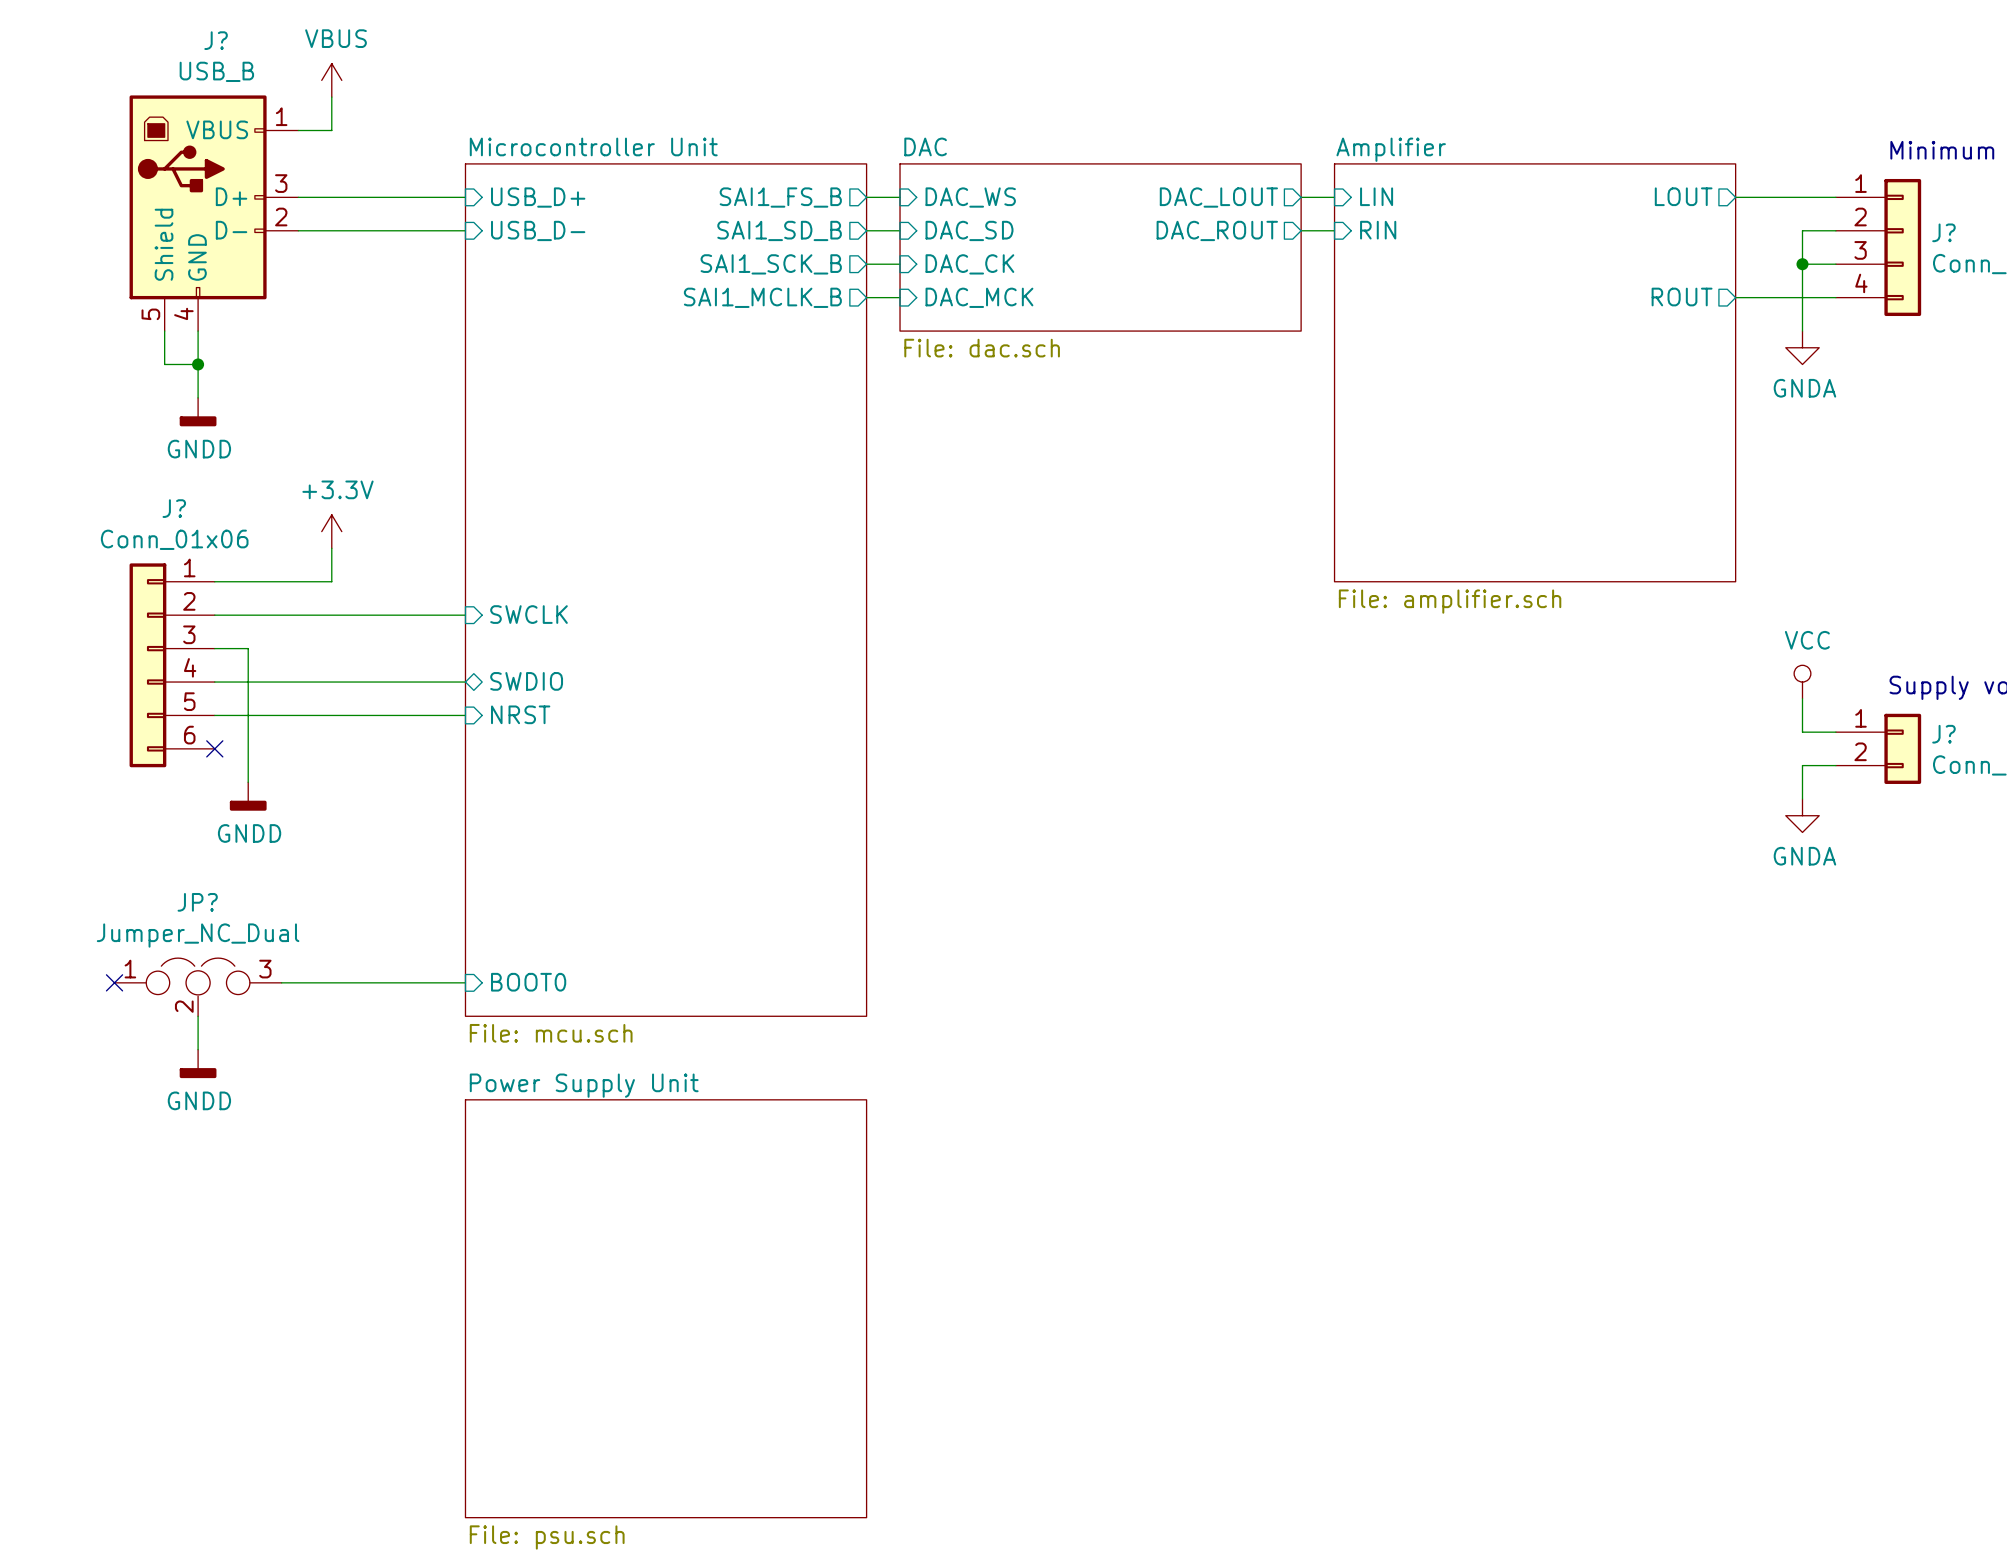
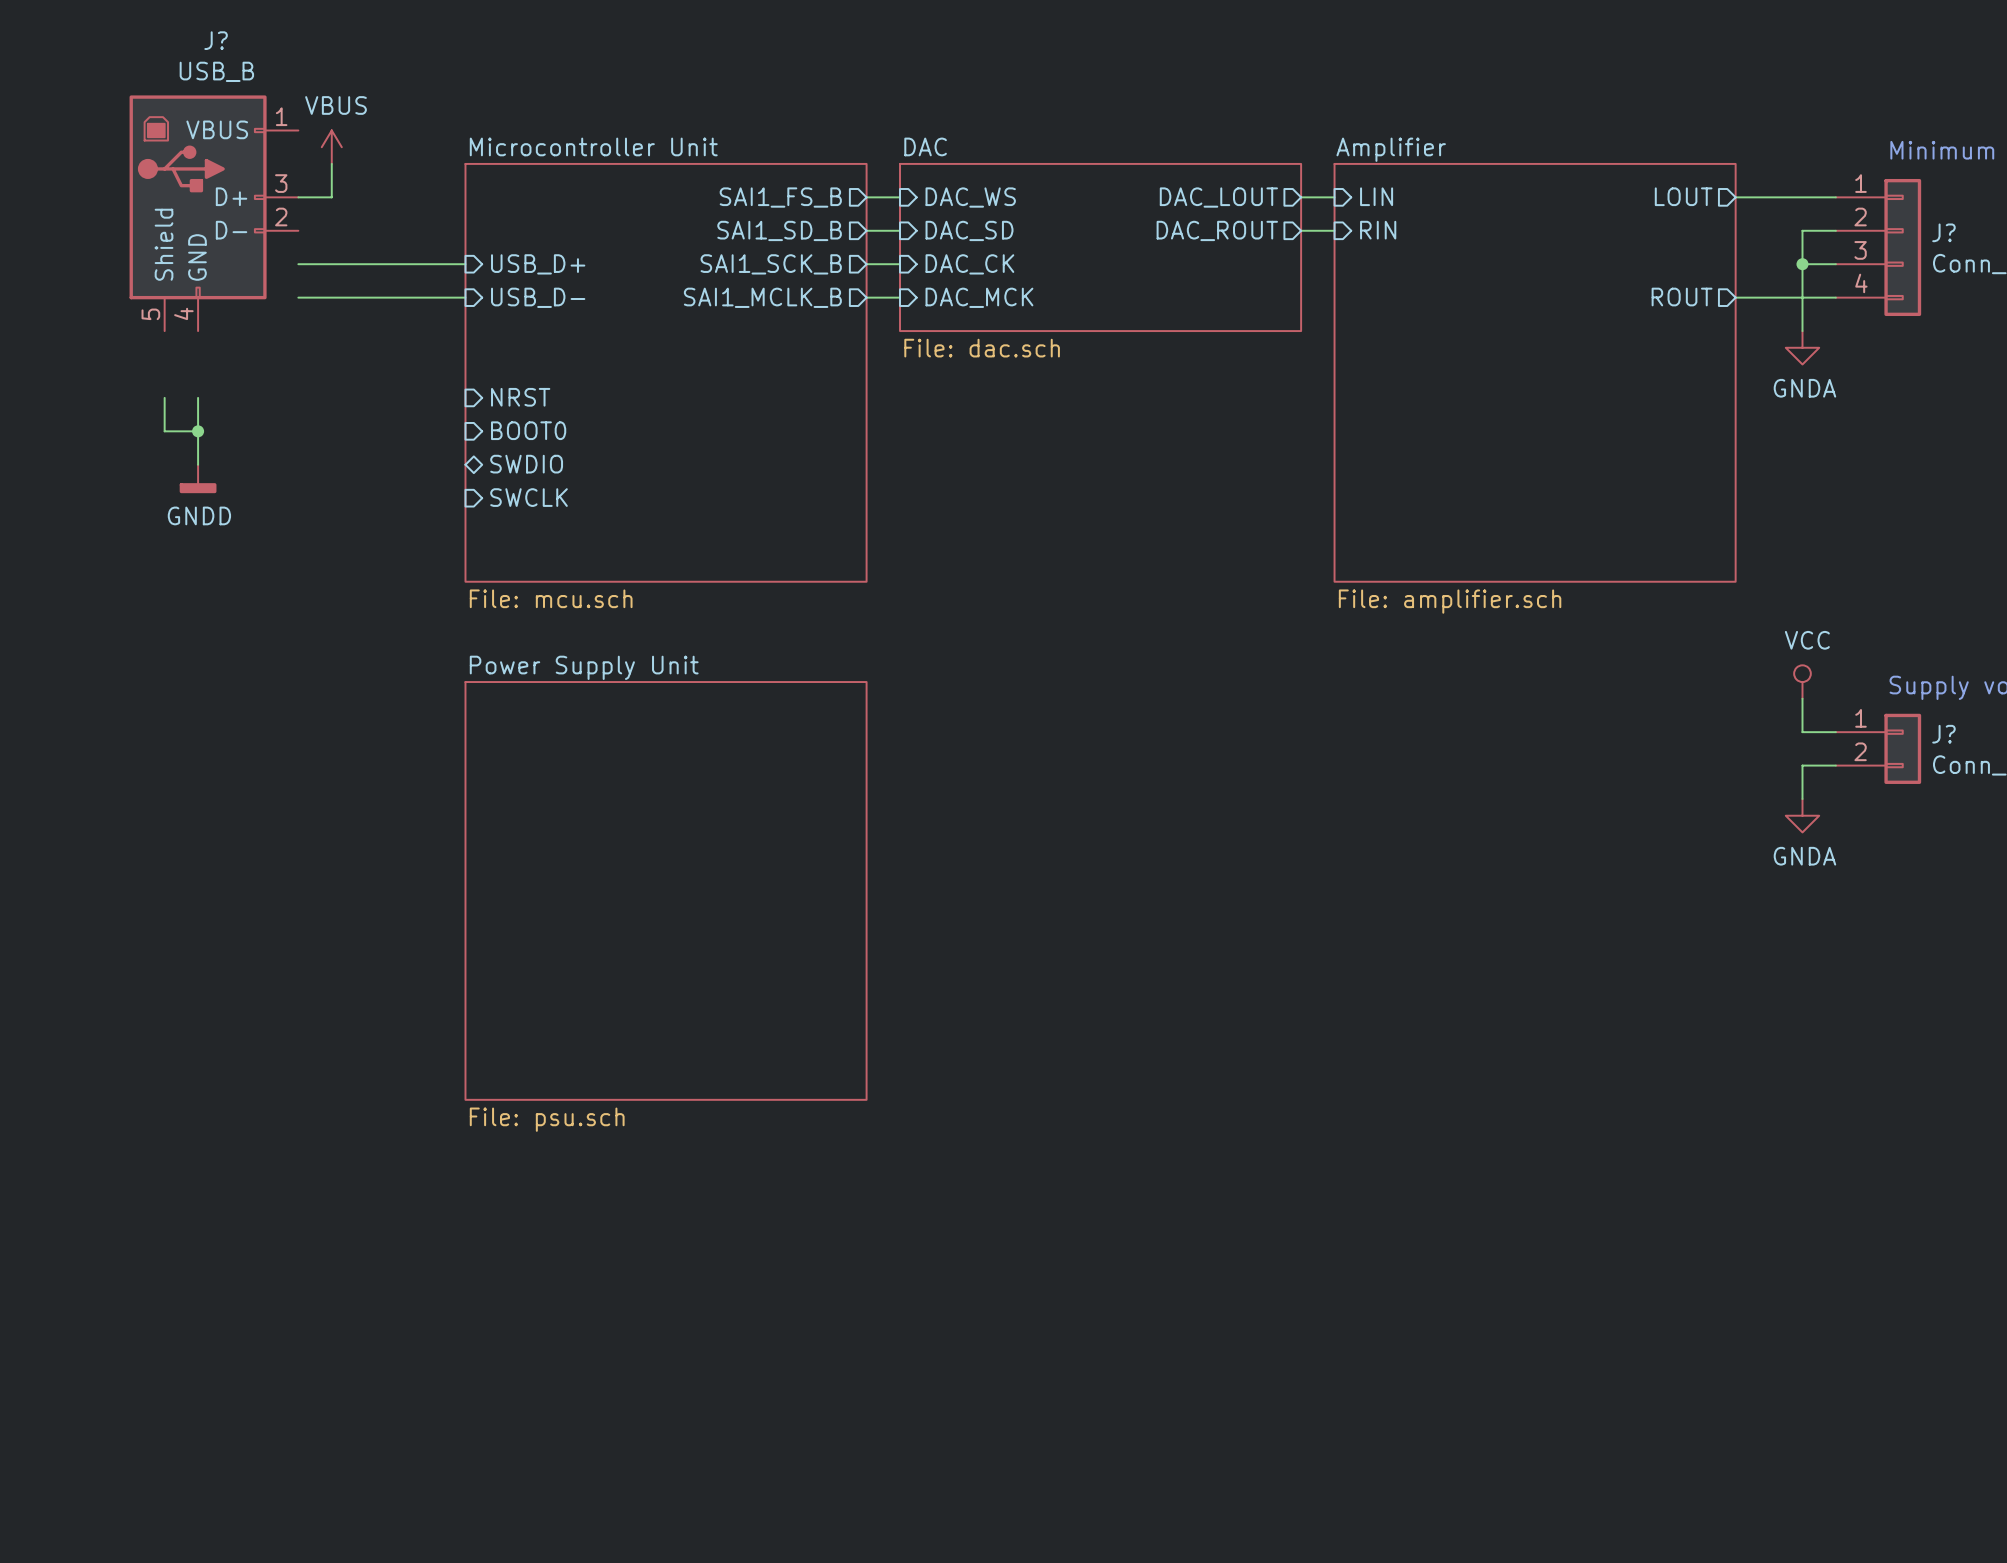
power symbol position: VBUS (331, 80) -> VBUS (331, 147)
wire: (331, 97) (331, 130) (298, 130) -> none
wire: (331, 197) (465, 197) -> (331, 197) (331, 163)
sheet pin position: USB_D+ (538, 197) -> USB_D+ (538, 264)
wire: (298, 230) (465, 230) -> (298, 297) (465, 297)
sheet pin position: USB_D- (538, 230) -> USB_D- (538, 297)
wire: none -> (298, 264) (465, 264)
wire: (164, 331) (164, 364) (198, 364) -> (164, 397) (164, 431) (198, 431)
wire: (198, 331) (198, 397) -> (198, 464) (198, 397)
junction position: (198, 364) -> (198, 431)
sheet Microcontroller Unit: none -> File: mcu.sch (666, 372)
power symbol position: GNDD (198, 412) -> GNDD (198, 478)
sheet pin: none -> BOOT0 (528, 430)
power symbol: +3.3V (331, 531) -> none
wire: (331, 548) (331, 581) (214, 581) -> none
sheet Microcontroller Unit: File: mcu.sch (666, 590) -> none
sheet pin position: SWCLK (529, 614) -> SWCLK (529, 497)
wire: (214, 615) (465, 615) -> none
wire: (214, 648) (248, 648) (248, 782) -> none
J?: Conn_01x06 (172, 665) -> none
sheet pin position: SWDIO (526, 681) -> SWDIO (526, 464)
wire: (214, 682) (465, 682) -> none
sheet pin position: NRST (520, 714) -> NRST (520, 397)
wire: (214, 715) (465, 715) -> none
no-connect mark: (214, 748) -> none
power symbol: GNDD (248, 796) -> none
sheet Power Supply Unit: none -> File: psu.sch (666, 890)
no-connect mark: (114, 982) -> none
wire: (281, 982) (465, 982) -> none
sheet pin: BOOT0 (528, 982) -> none
JP?: Jumper_NC_Dual (198, 987) -> none
wire: (198, 1016) (198, 1049) -> none
power symbol: GNDD (198, 1063) -> none
sheet Power Supply Unit: File: psu.sch (666, 1308) -> none

